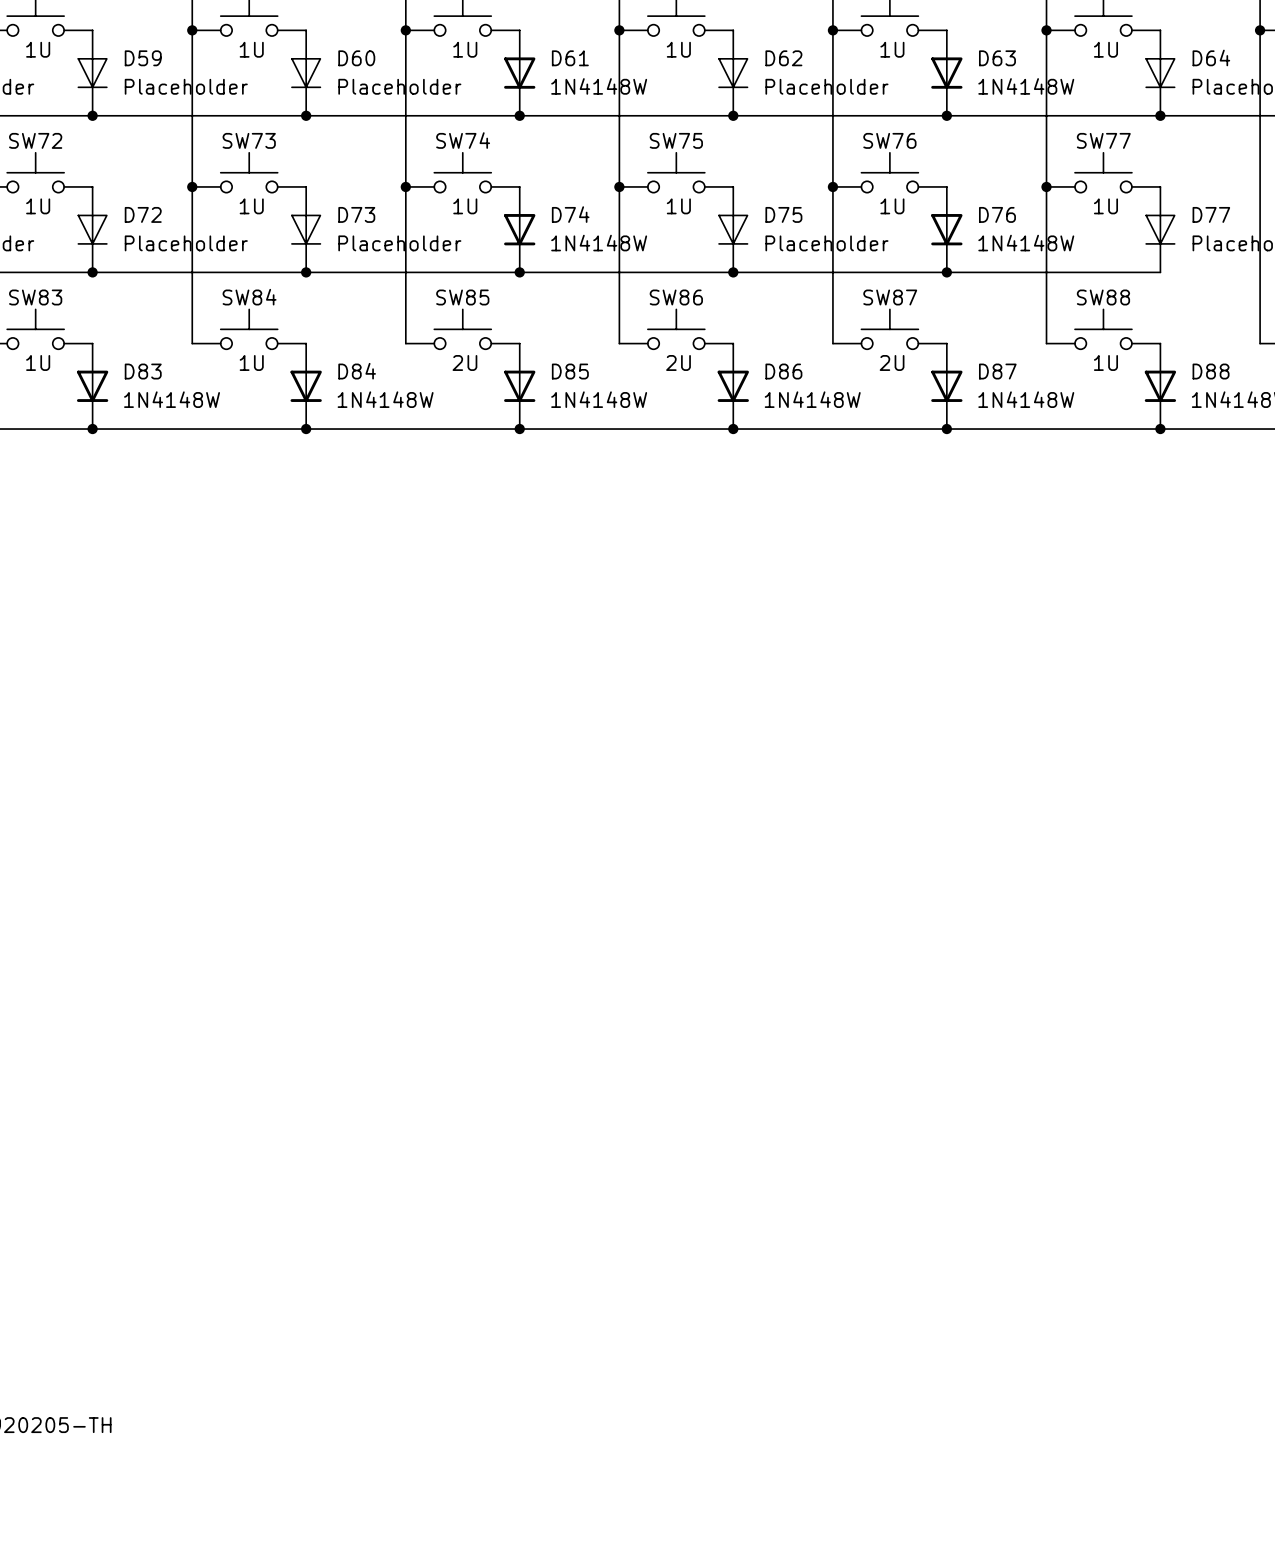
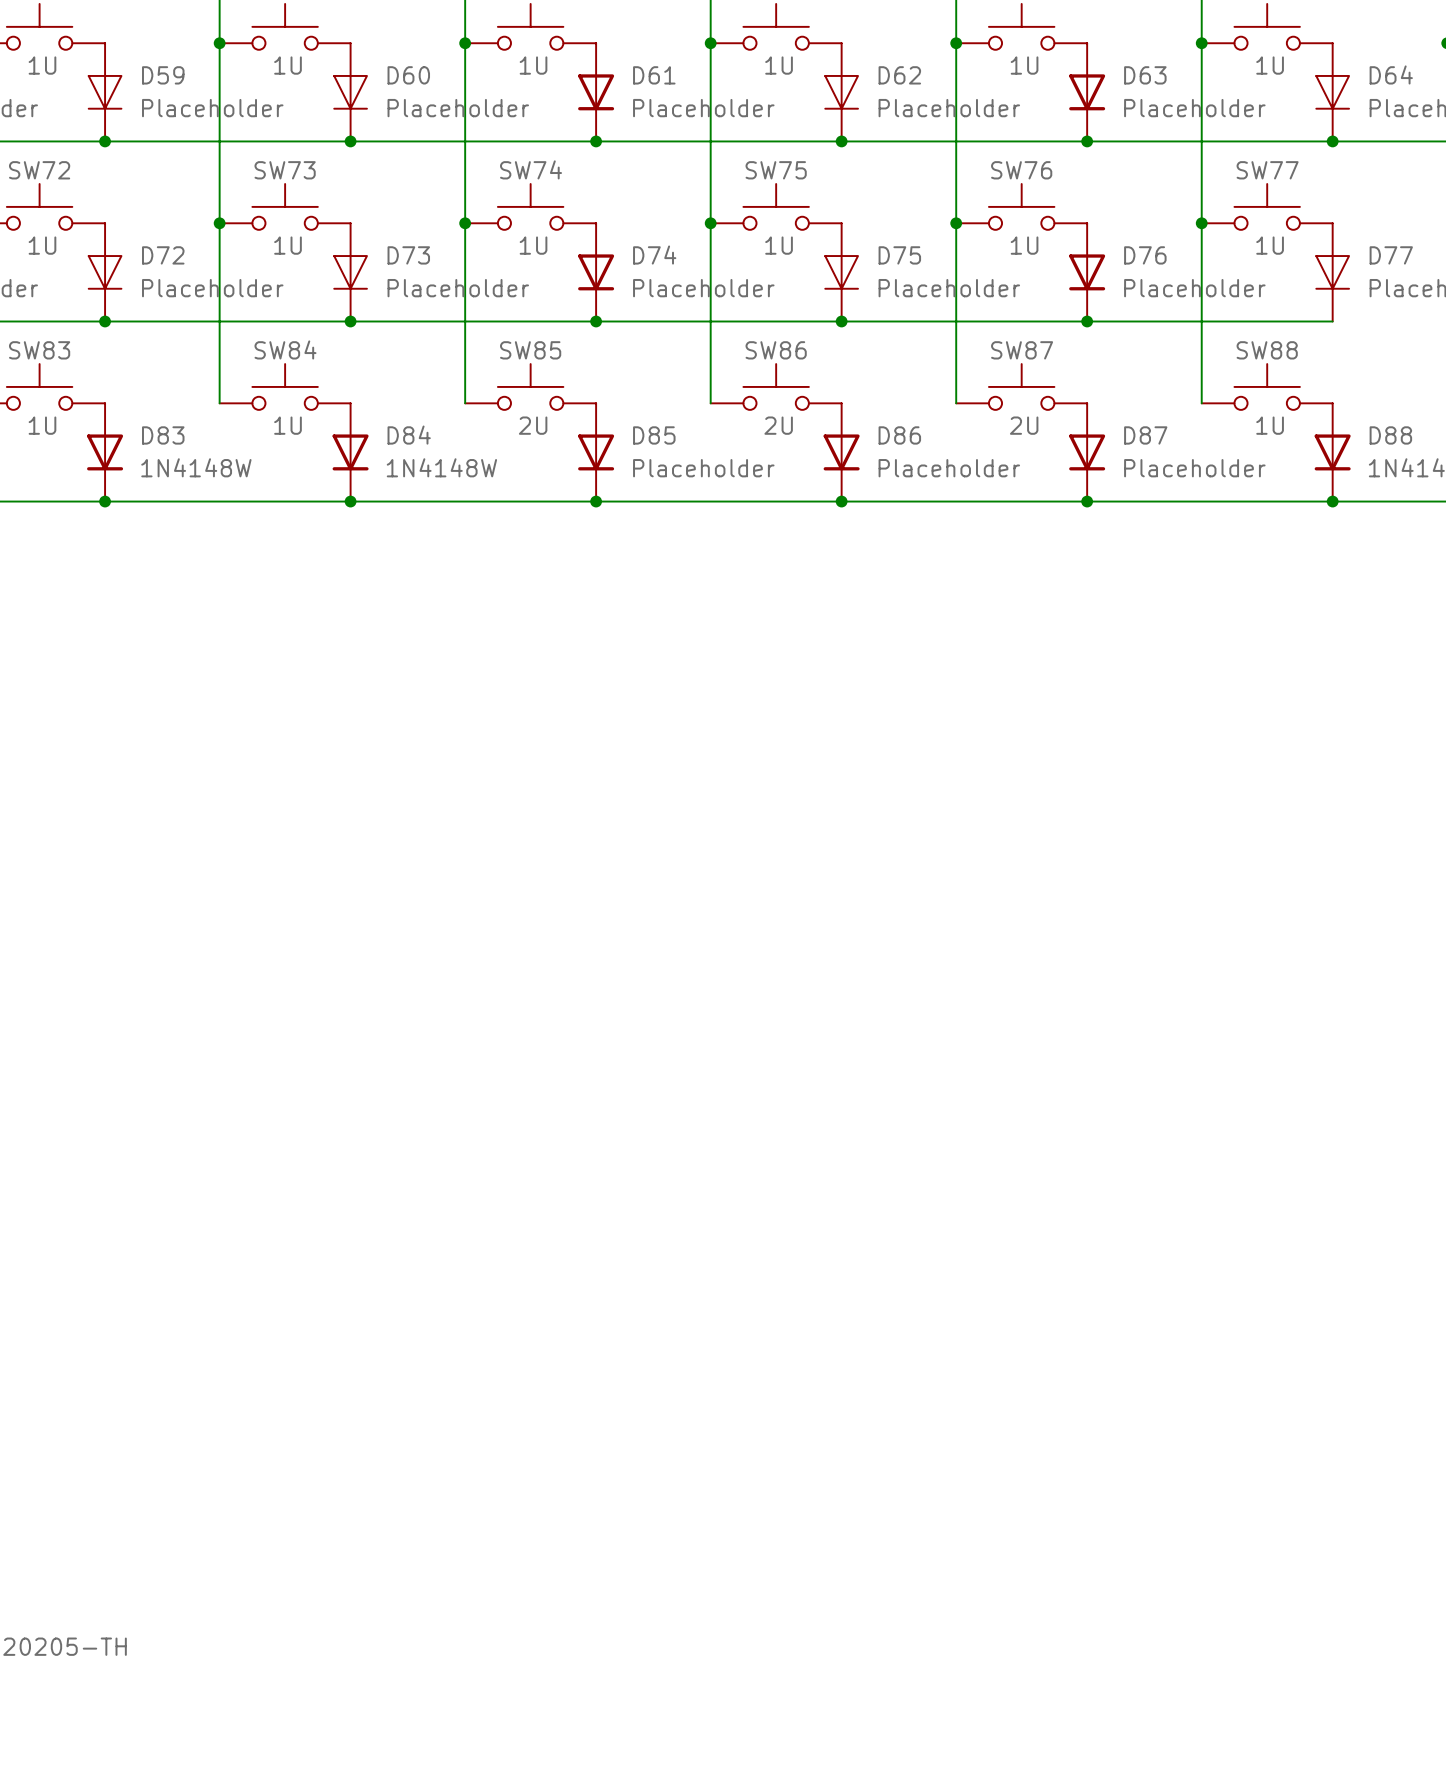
D61 value: 1N4148W (599, 86) -> Placeholder (703, 108)
D63 value: 1N4148W (1026, 86) -> Placeholder (1194, 108)
D74 value: 1N4148W (599, 243) -> Placeholder (703, 288)
D76 value: 1N4148W (1026, 243) -> Placeholder (1194, 288)
D85 value: 1N4148W (599, 399) -> Placeholder (703, 468)
D86 value: 1N4148W (812, 399) -> Placeholder (949, 468)
D87 value: 1N4148W (1026, 399) -> Placeholder (1194, 468)

